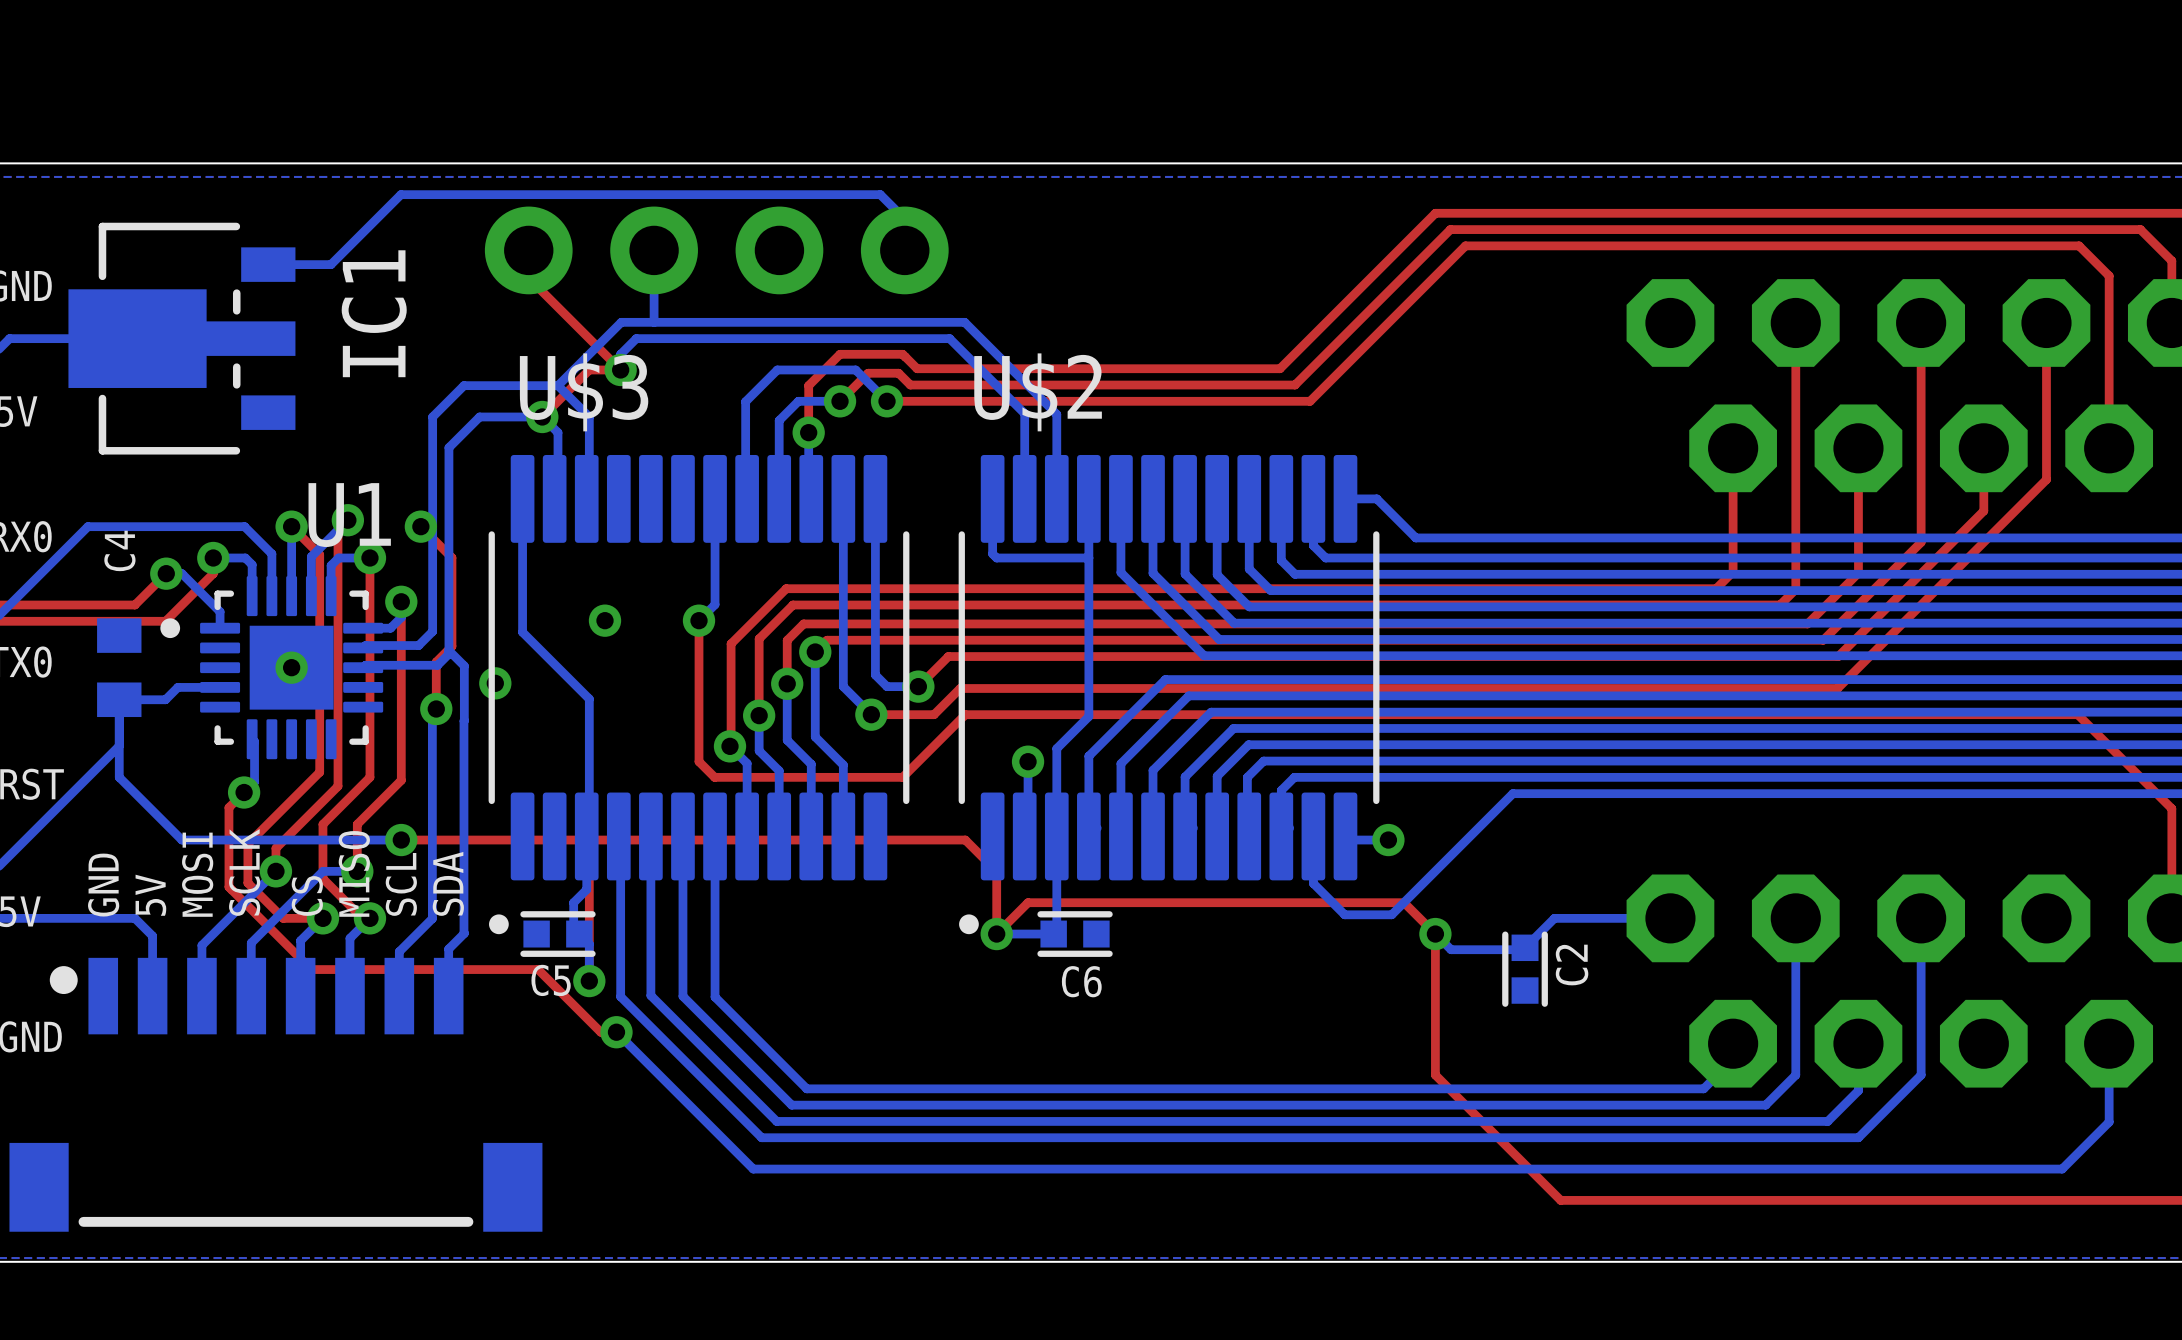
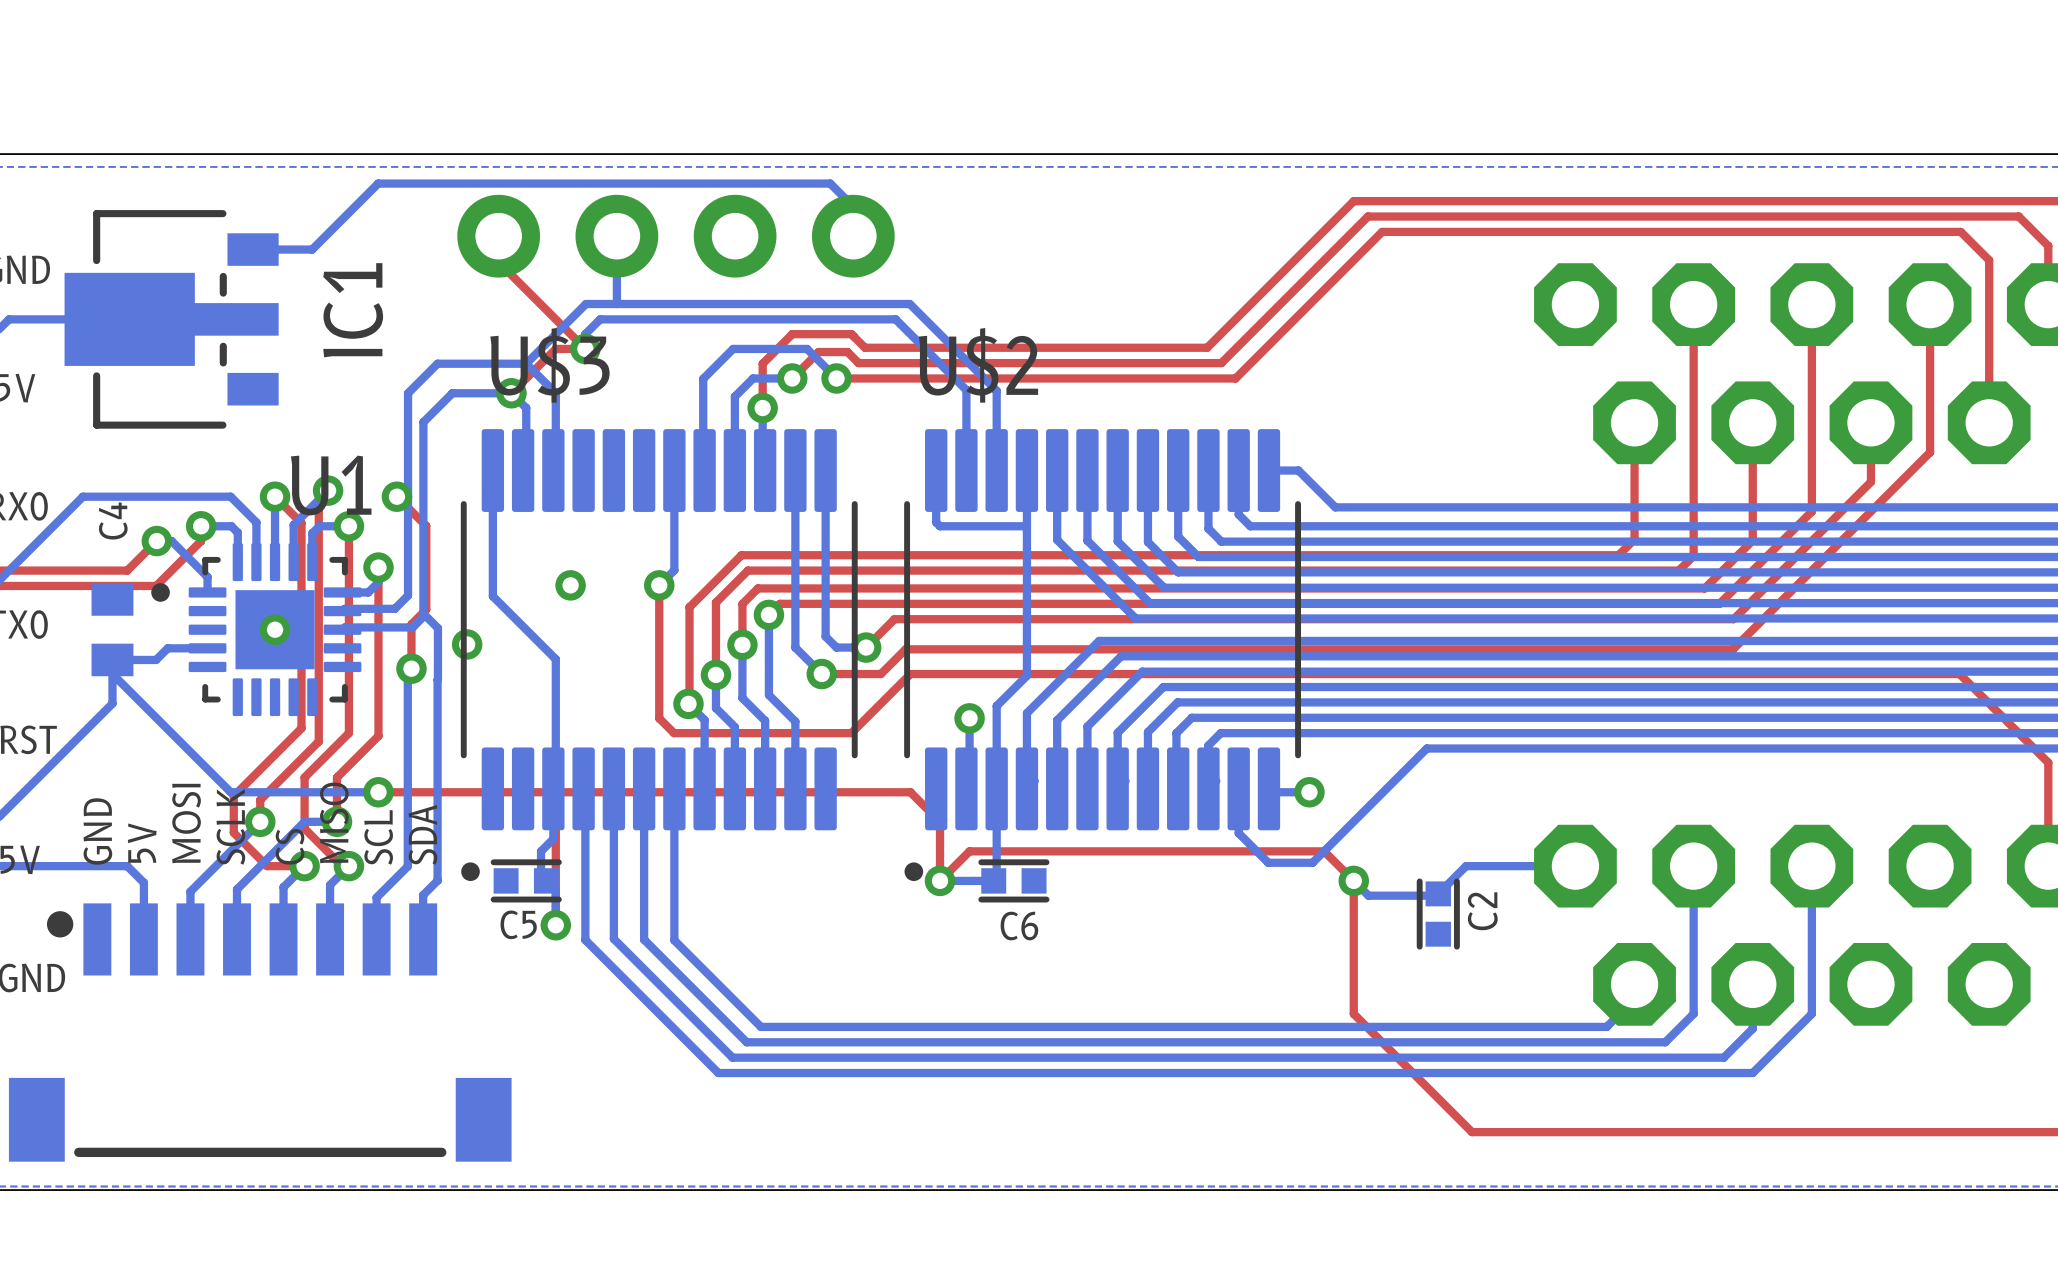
bottom track: (252, 739) (254, 741) (254, 782) (244, 792) -> none
bottom track: (119, 746) (119, 777) (181, 840) (244, 840) -> (112, 674) (230, 792)
top track: (244, 792) (228, 807) (228, 887) (311, 969) (538, 969) (600, 1032) (616, 1032) -> none
via: (244, 792) -> none
bottom track: (616, 1032) (753, 1169) (2062, 1169) (2109, 1122) (2109, 1043) -> none
via: (616, 1032) -> none

